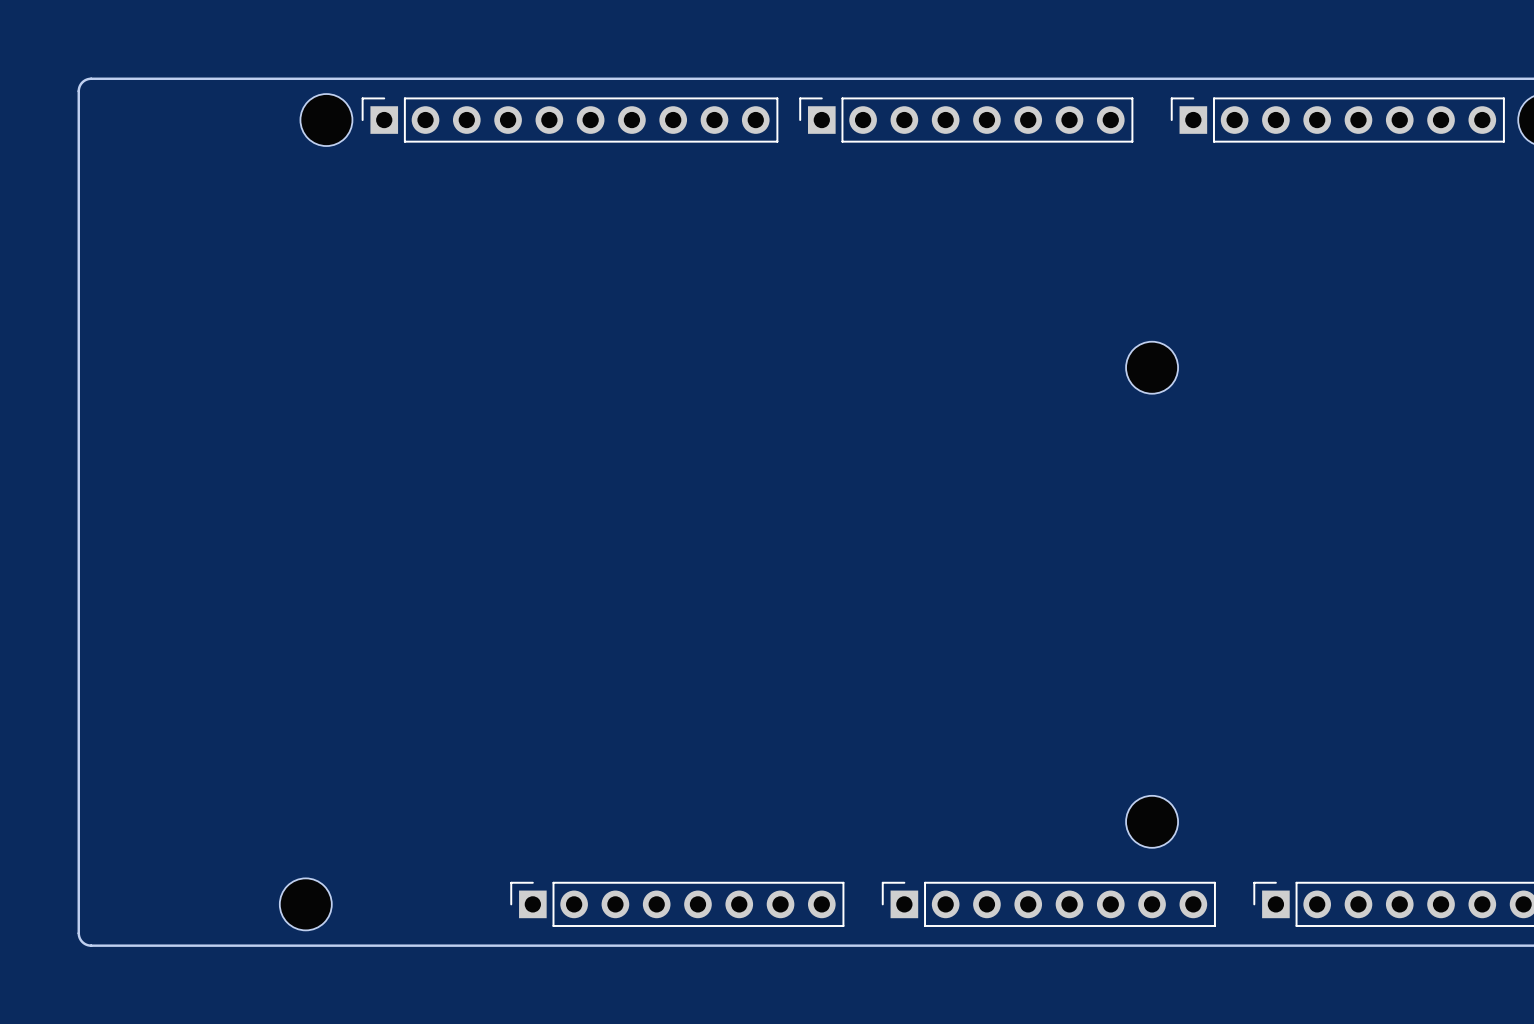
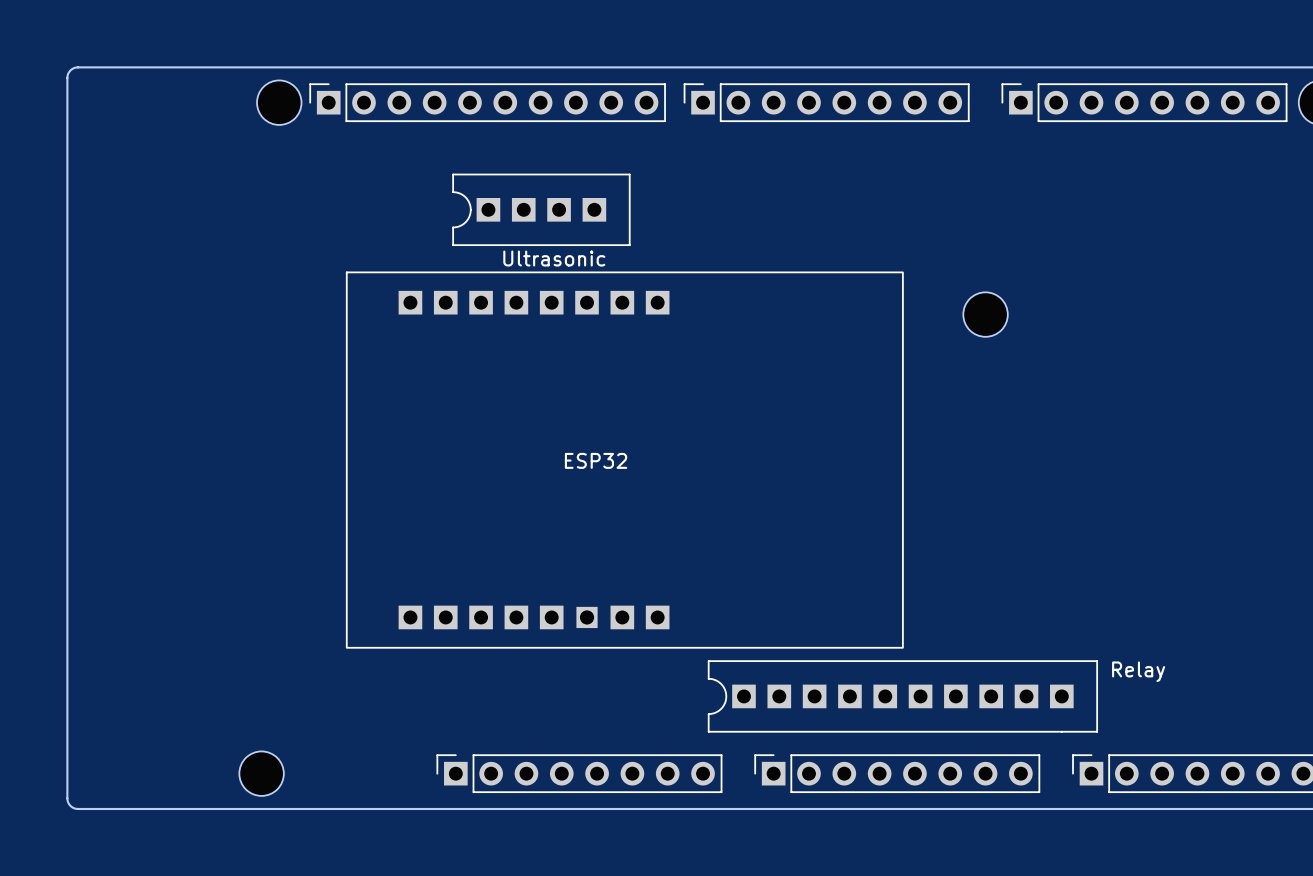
Ultrasonic: none -> (541, 209)
part: none -> ESP32 (624, 460)
Relay: none -> (902, 696)
part: (1152, 821) -> none

